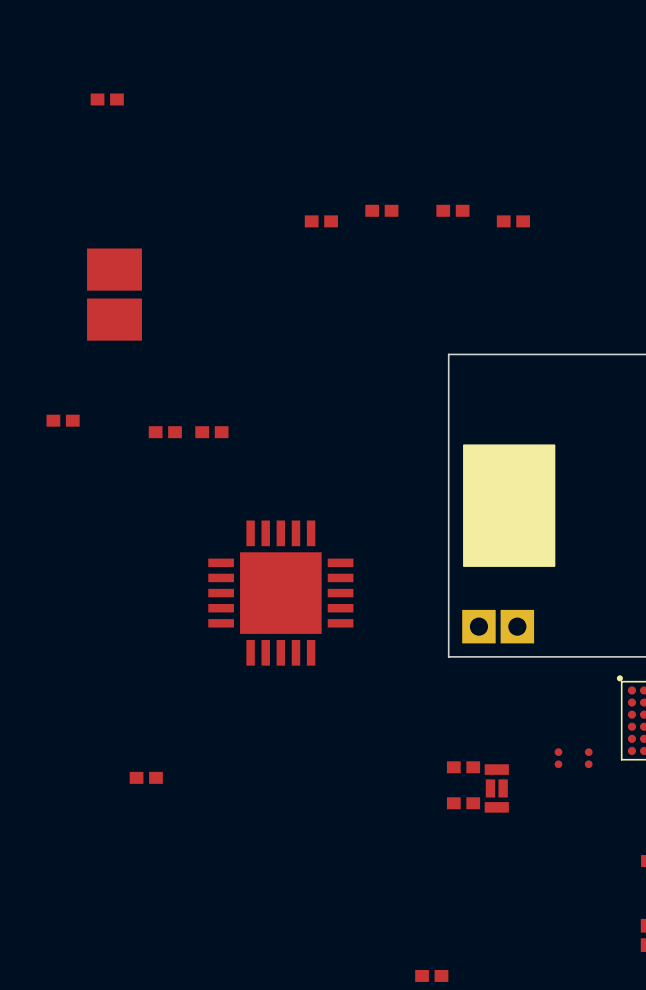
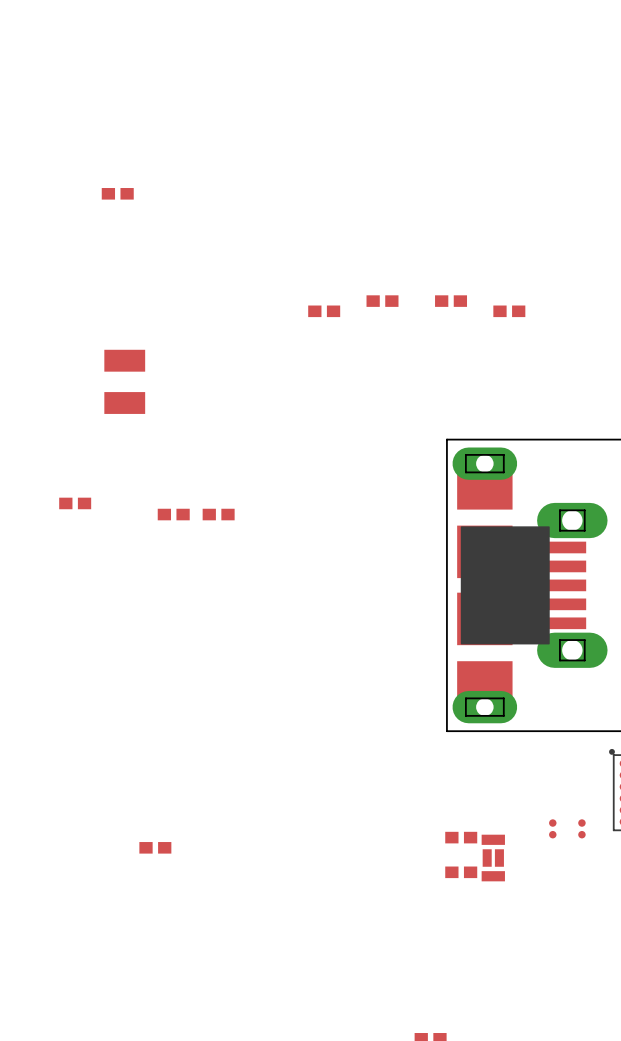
part footprint: [87, 248, 142, 341] -> [104, 349, 146, 414]
part: none -> (530, 585)
part: (280, 593) -> none
part: (498, 626) -> none

